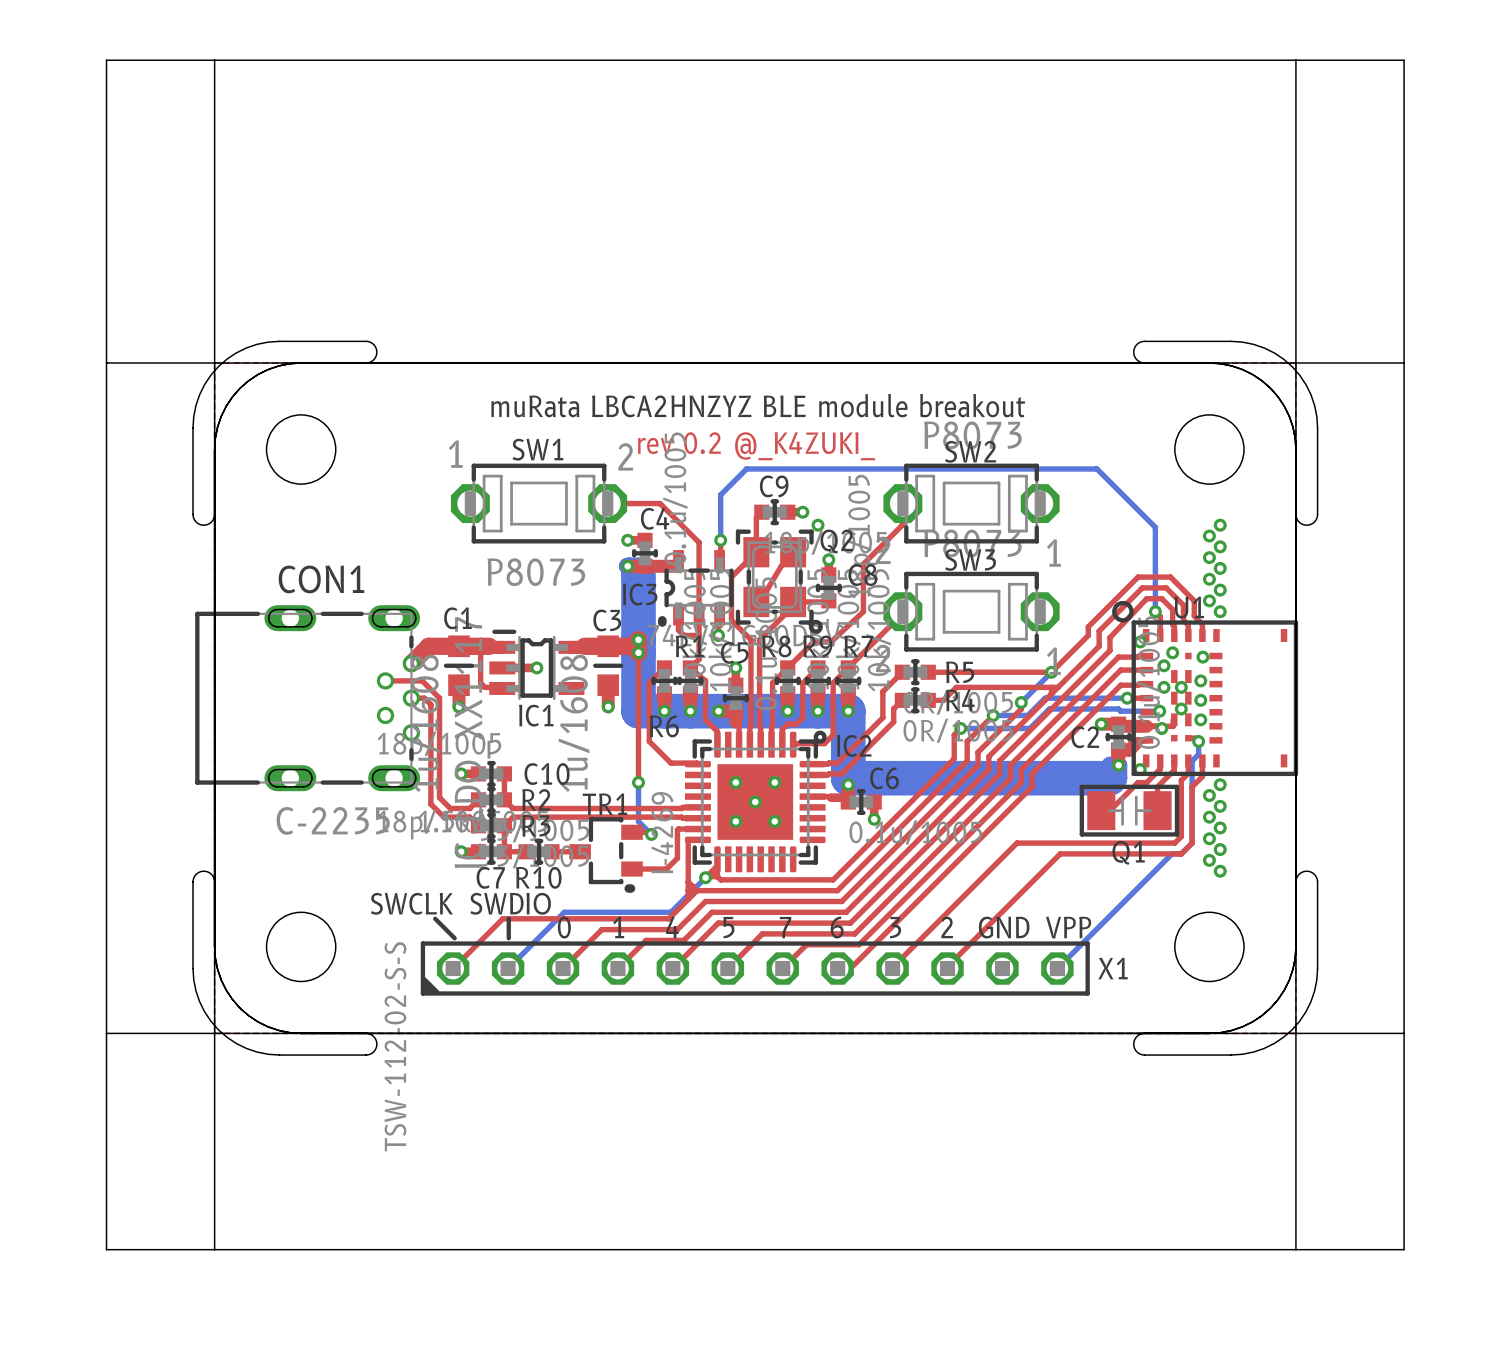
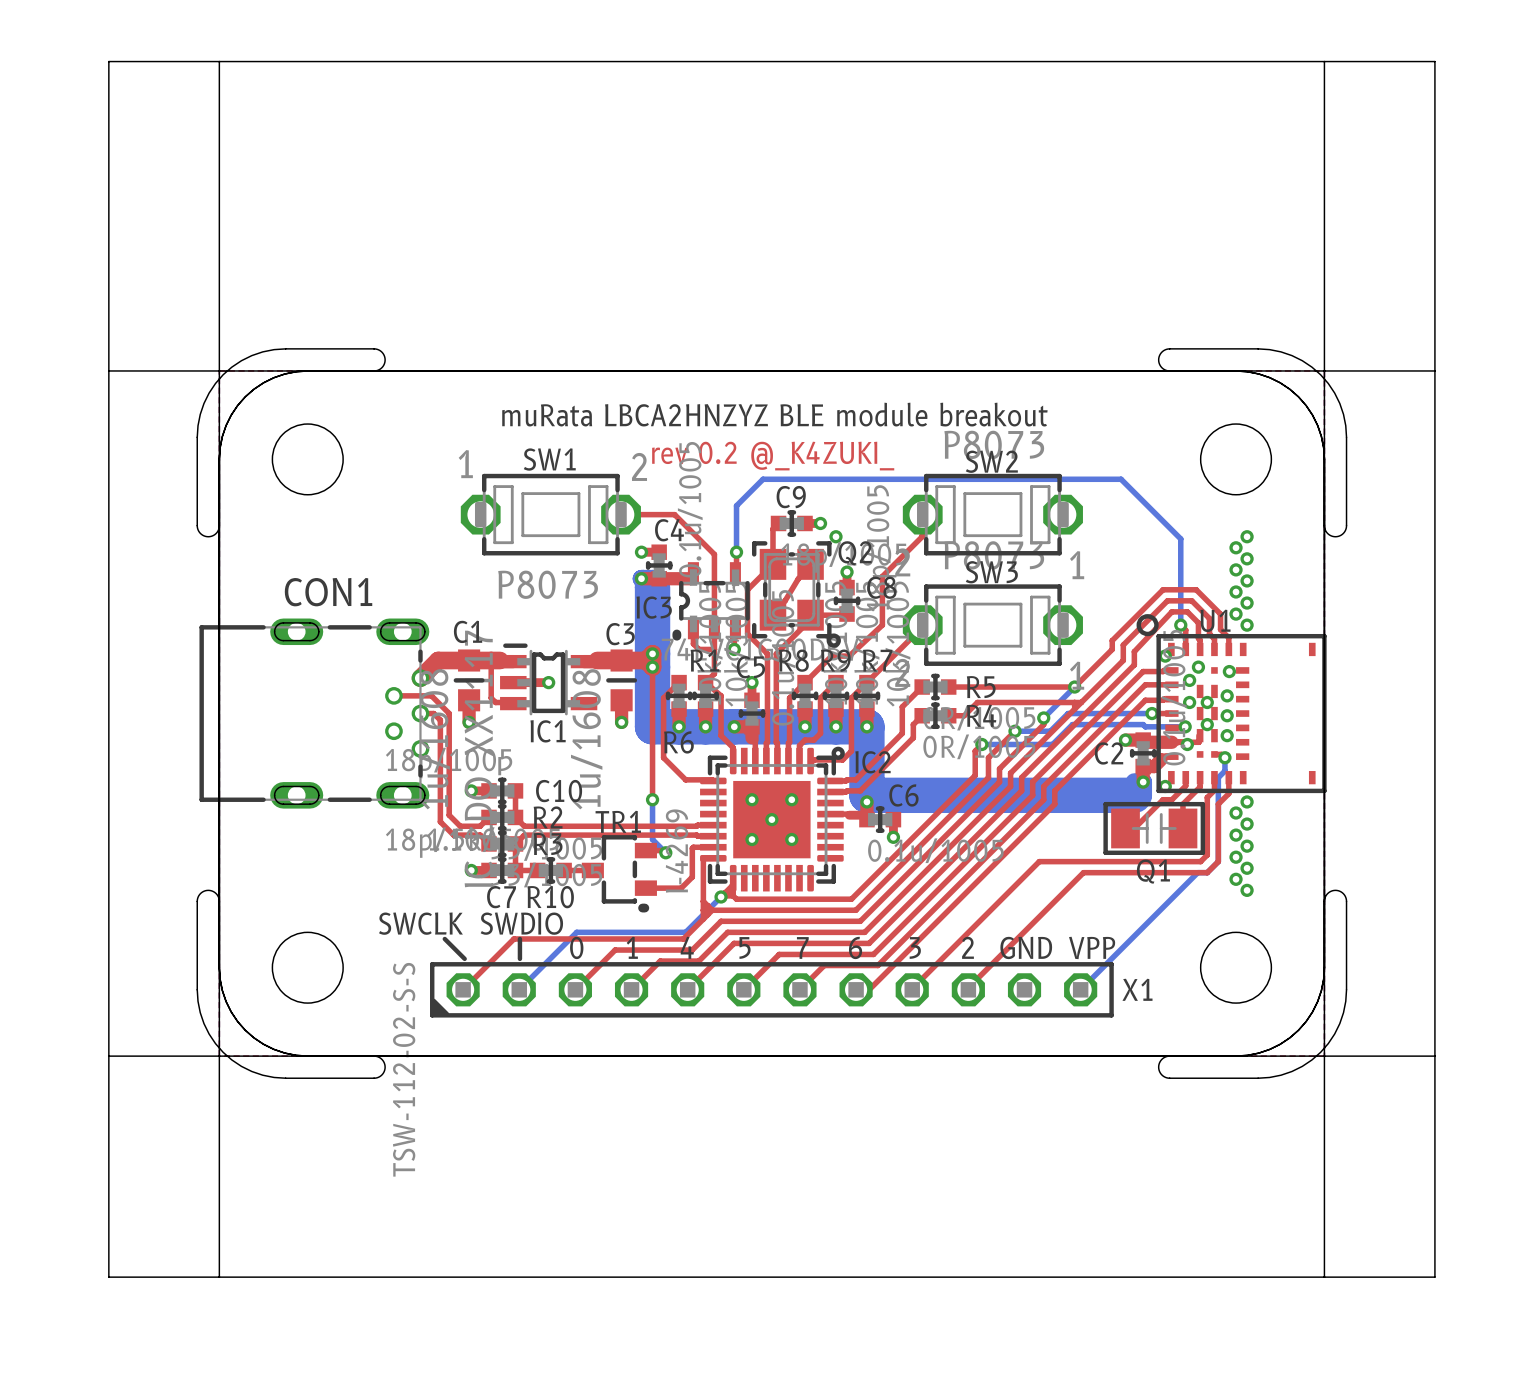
CON1 value: C-2235 (333, 820) -> none

